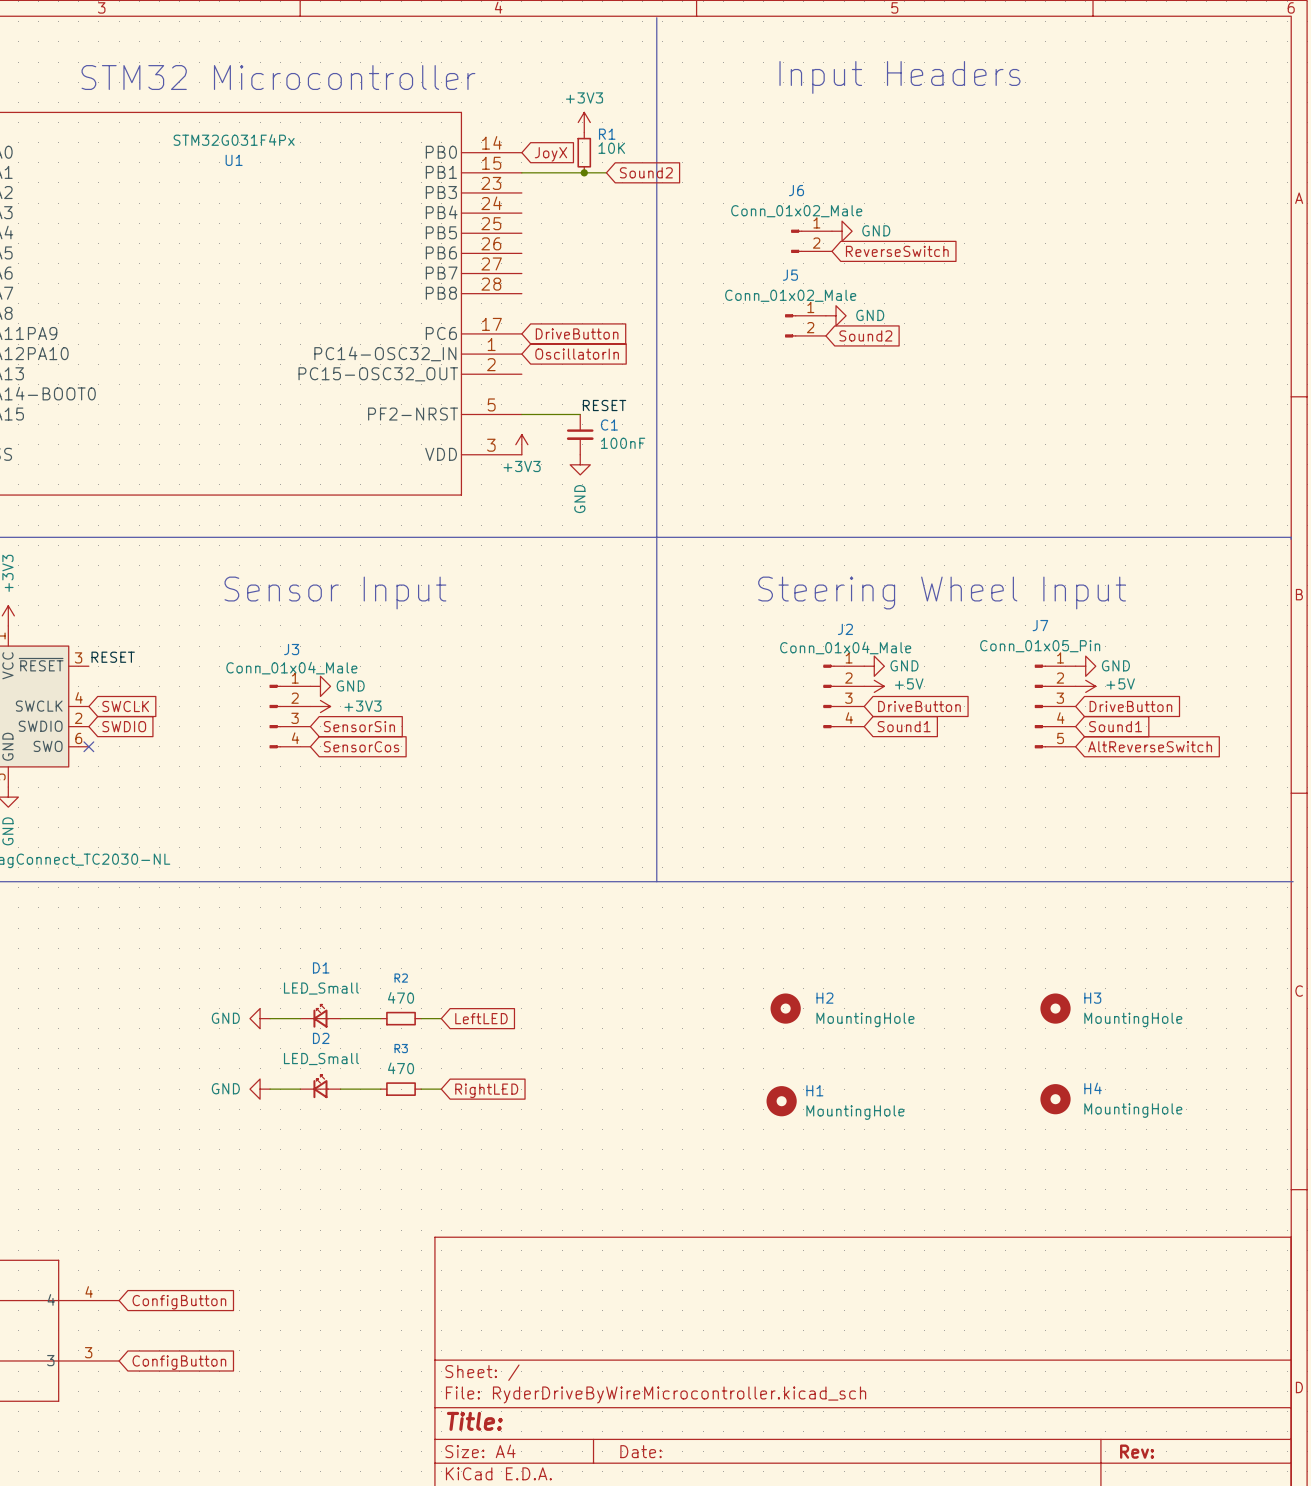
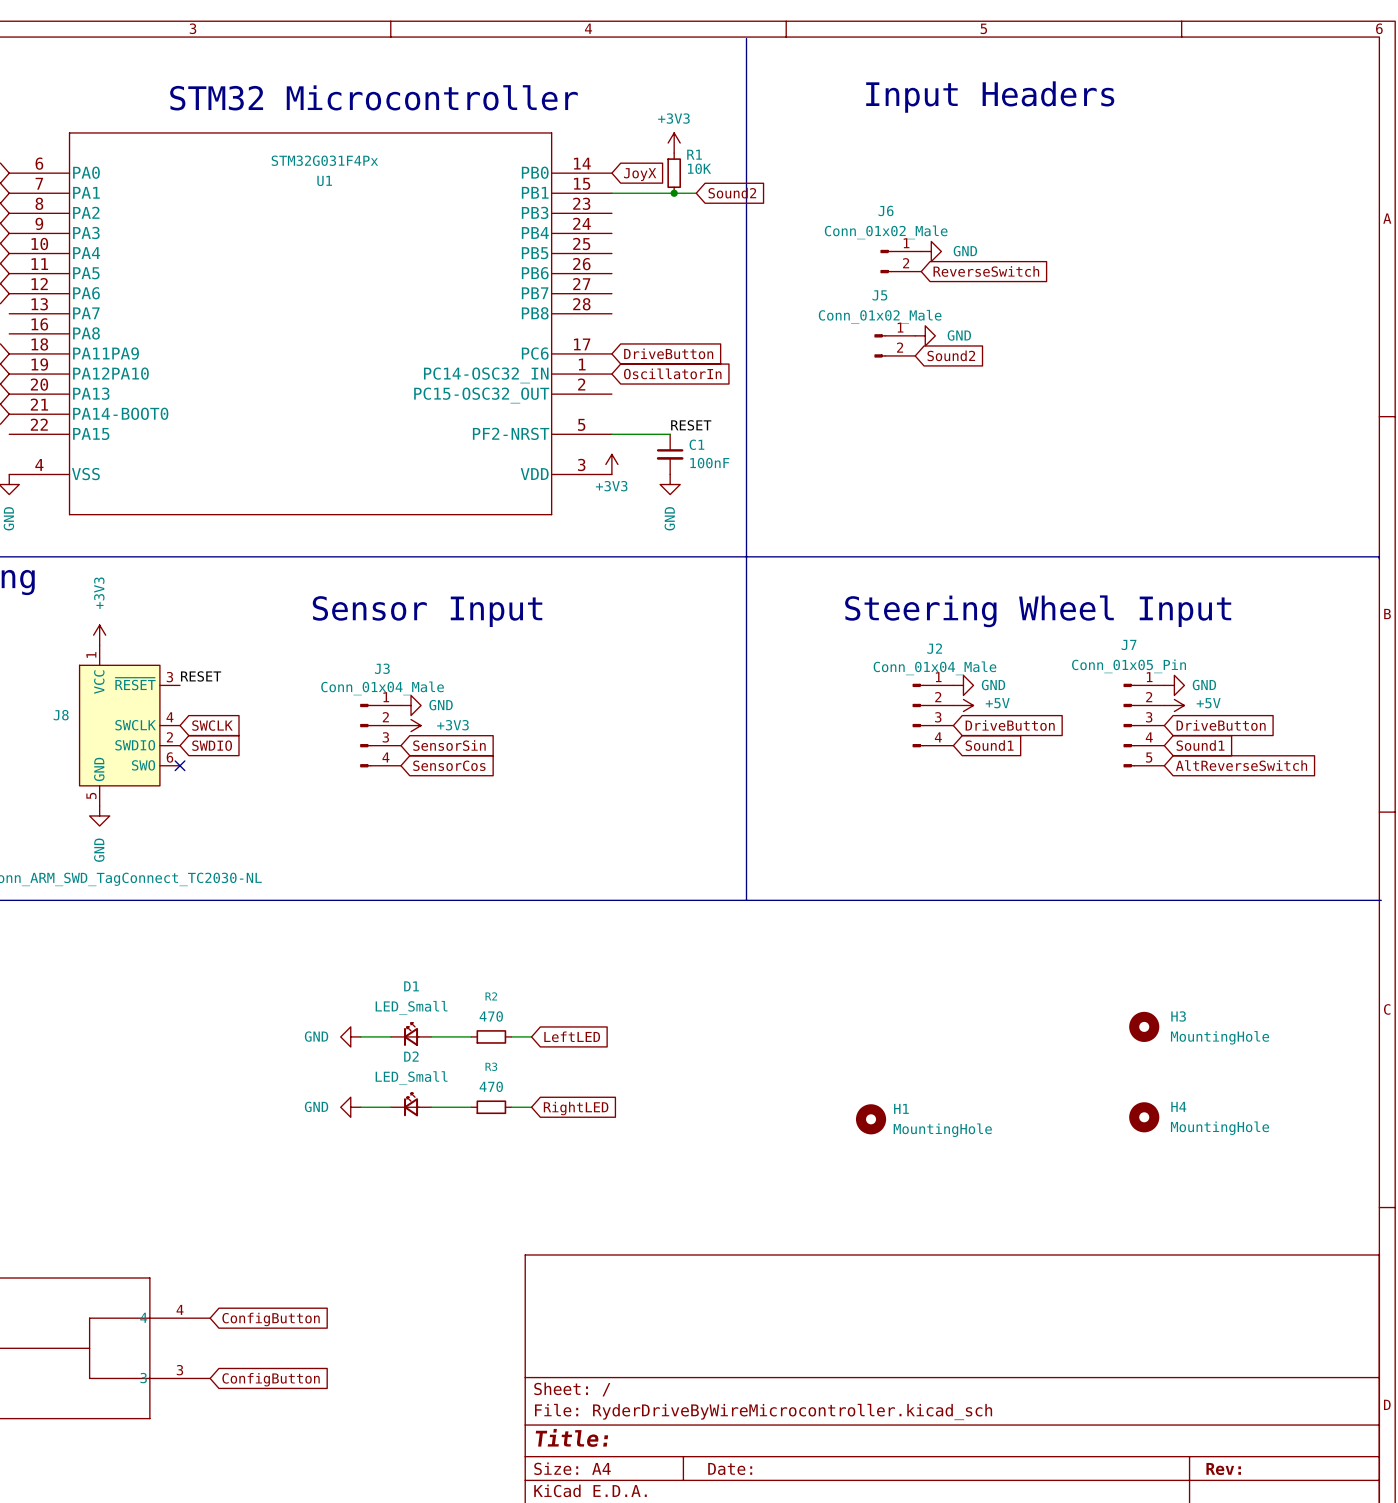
H2: MountingHole (785, 1008) -> none

